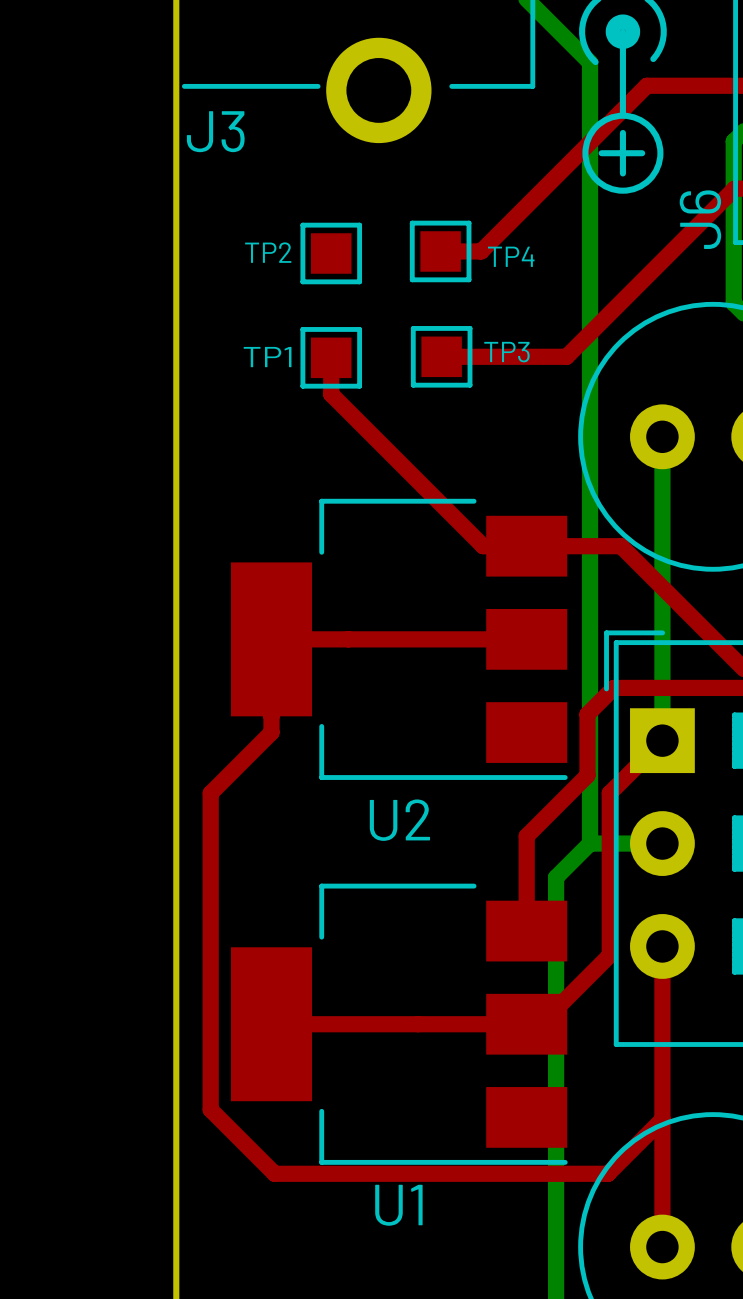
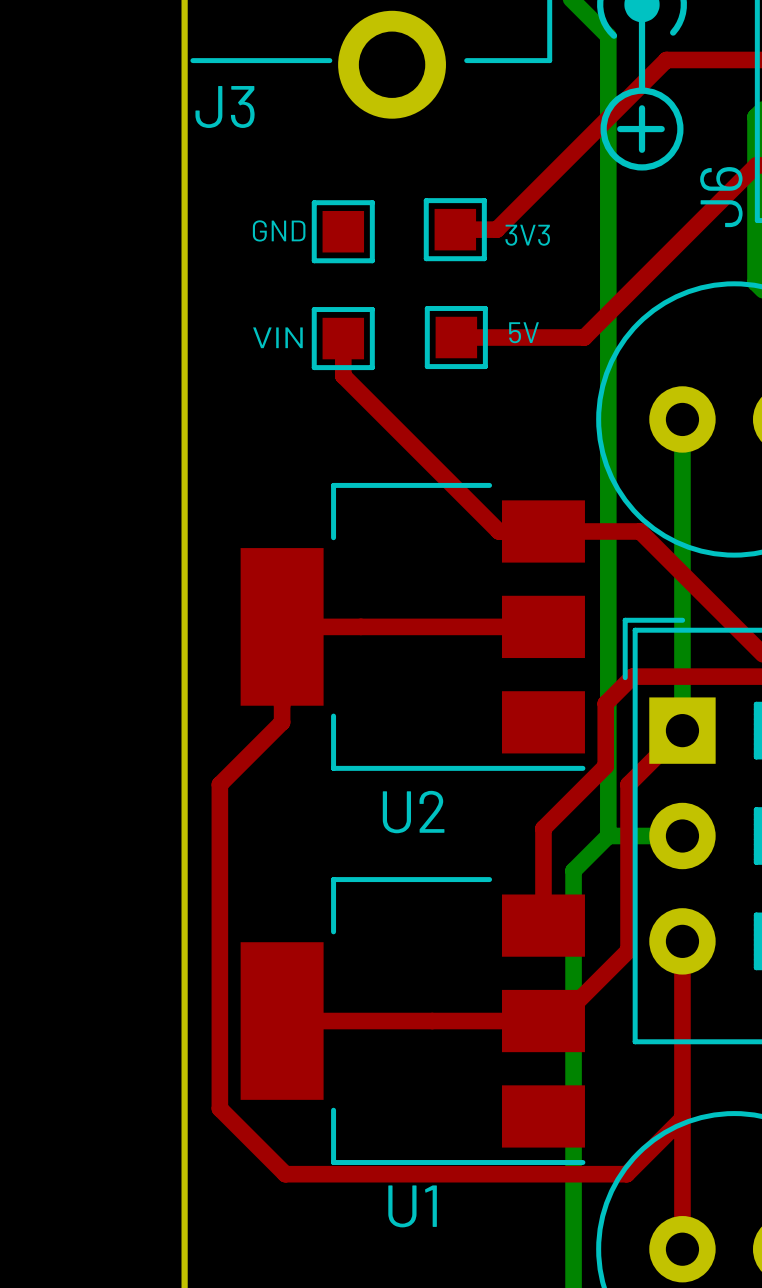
TP2 name: TP2 (268, 252) -> GND (279, 230)
TP4 name: TP4 (511, 256) -> 3V3 (527, 235)
TP3 name: TP3 (506, 352) -> 5V (524, 332)
TP1 name: TP1 (267, 357) -> VIN (277, 337)

